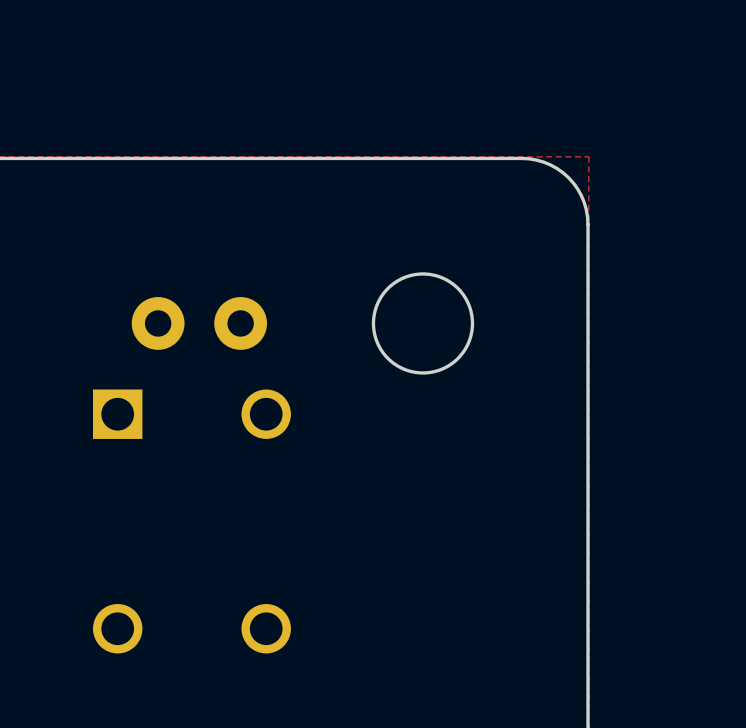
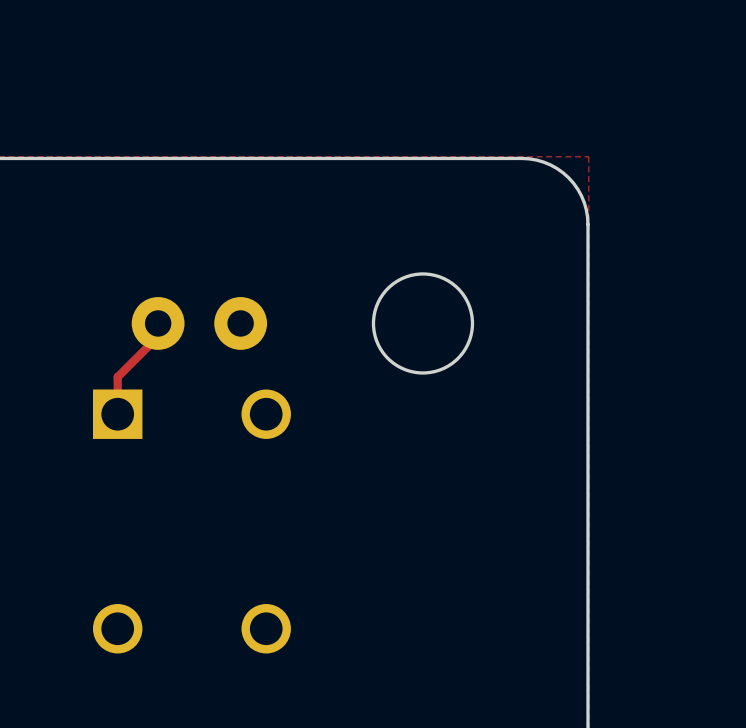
track: none -> (158, 323) (158, 336) (117, 377) (117, 414)

